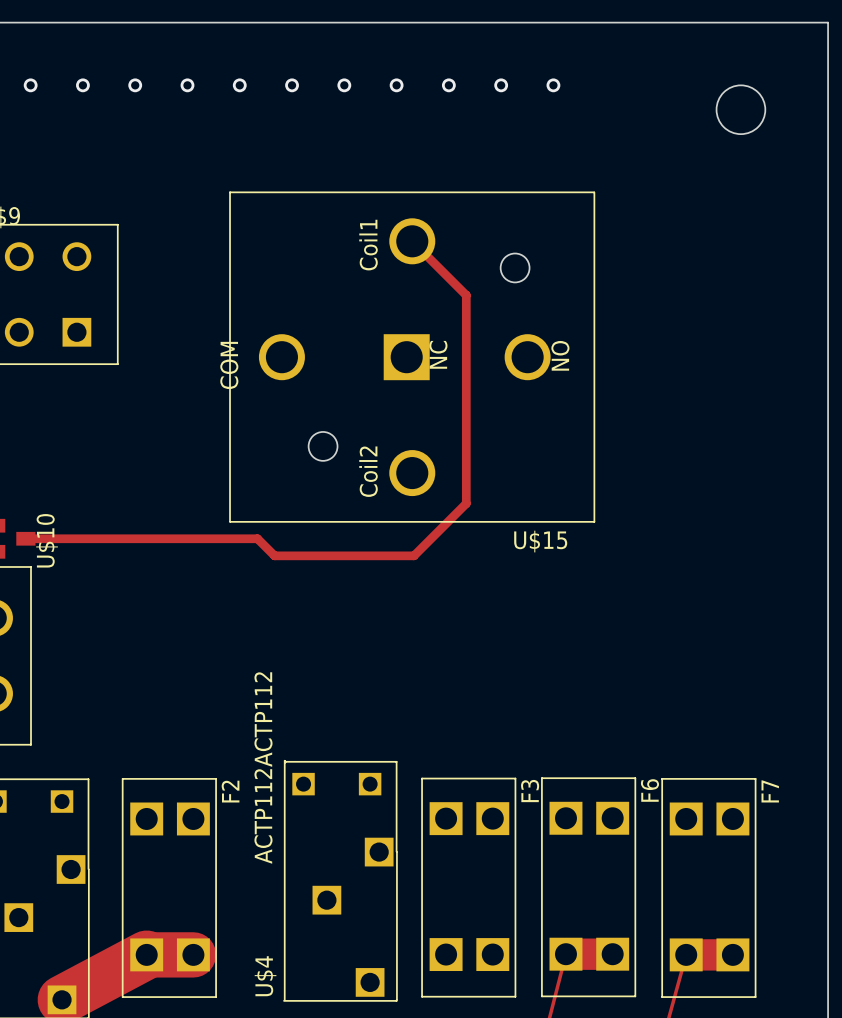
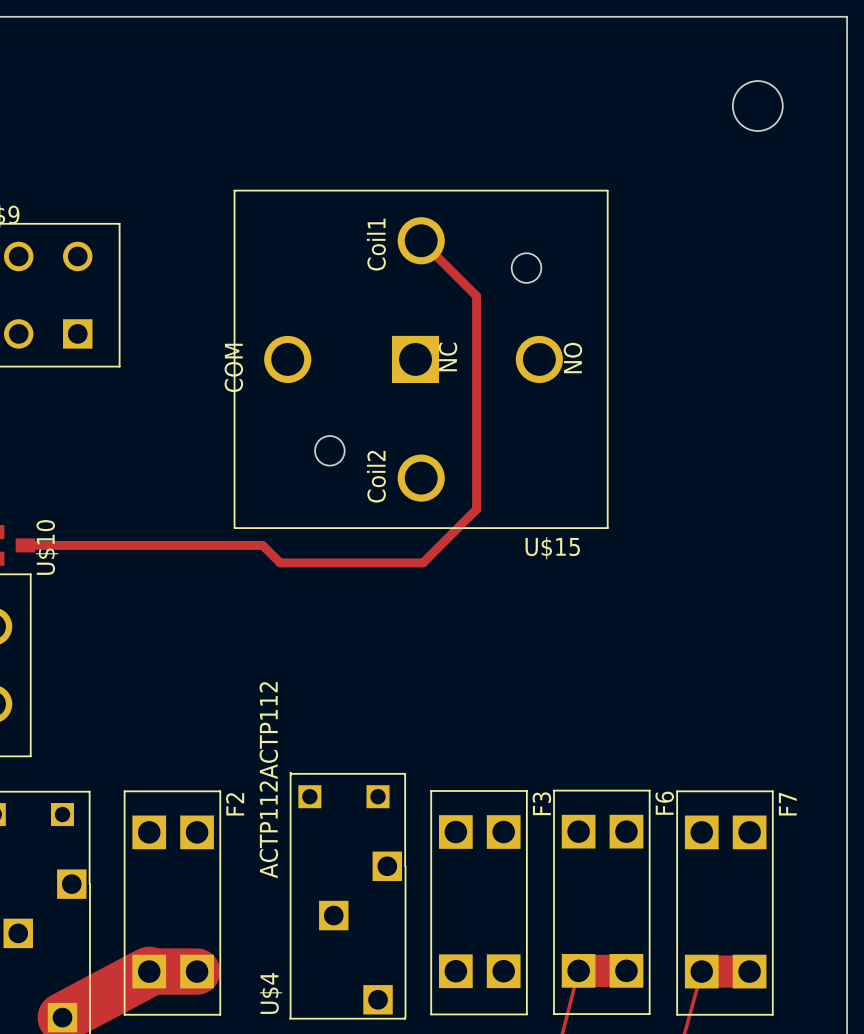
via: (30, 85) -> none
via: (82, 85) -> none
via: (135, 85) -> none
via: (187, 85) -> none
via: (239, 85) -> none
via: (292, 85) -> none
via: (344, 85) -> none
via: (396, 85) -> none
via: (448, 85) -> none
via: (501, 85) -> none
via: (553, 85) -> none

